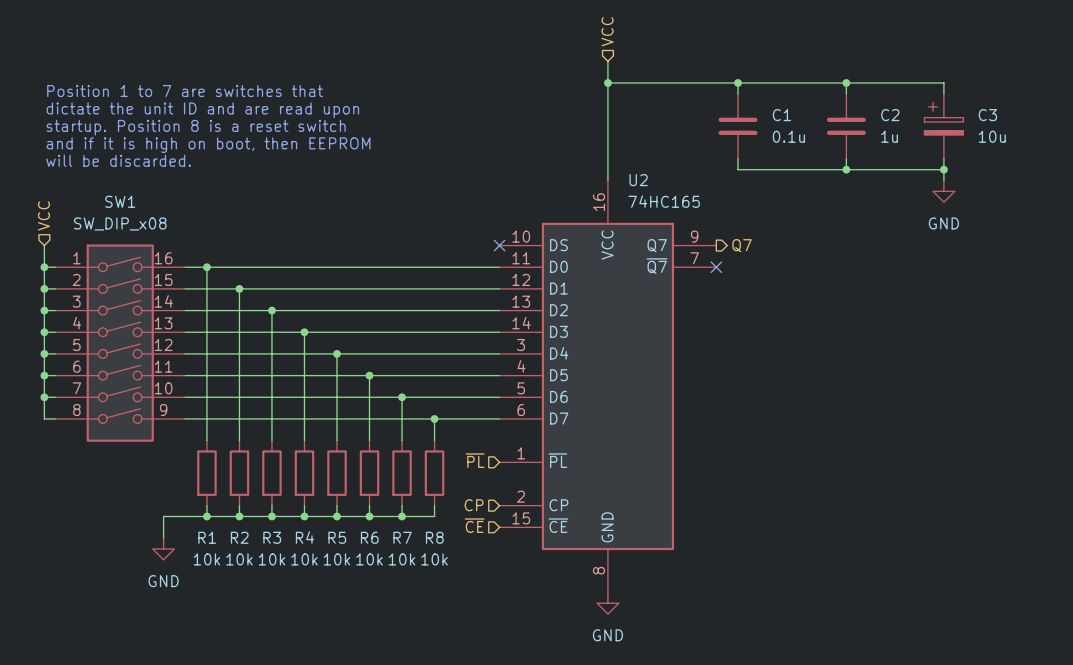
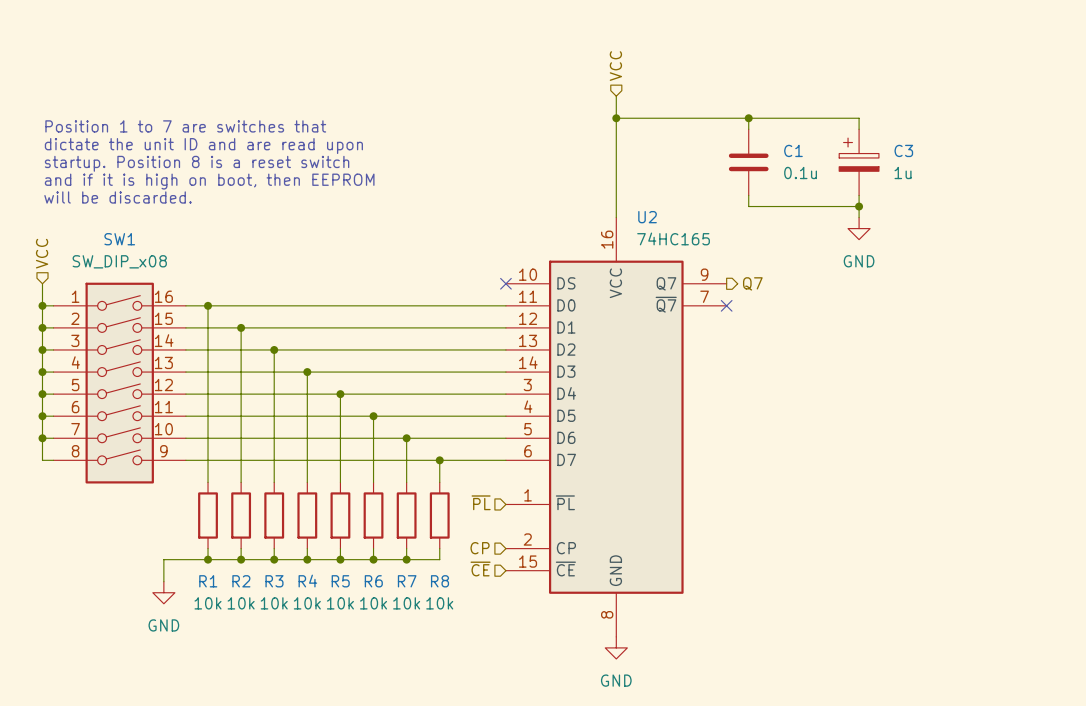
wire: (846, 82) (943, 82) (943, 93) -> none
junction: (846, 82) -> none
C2: 1u (846, 126) -> none
C3 position: (943, 126) -> (859, 162)
C3 value: 10u (992, 136) -> 1u (903, 173)
wire: (943, 158) (943, 180) -> none
wire: (846, 169) (943, 169) -> (859, 206) (859, 217)
junction: (943, 169) -> none
power symbol position: GND (943, 191) -> GND (859, 228)

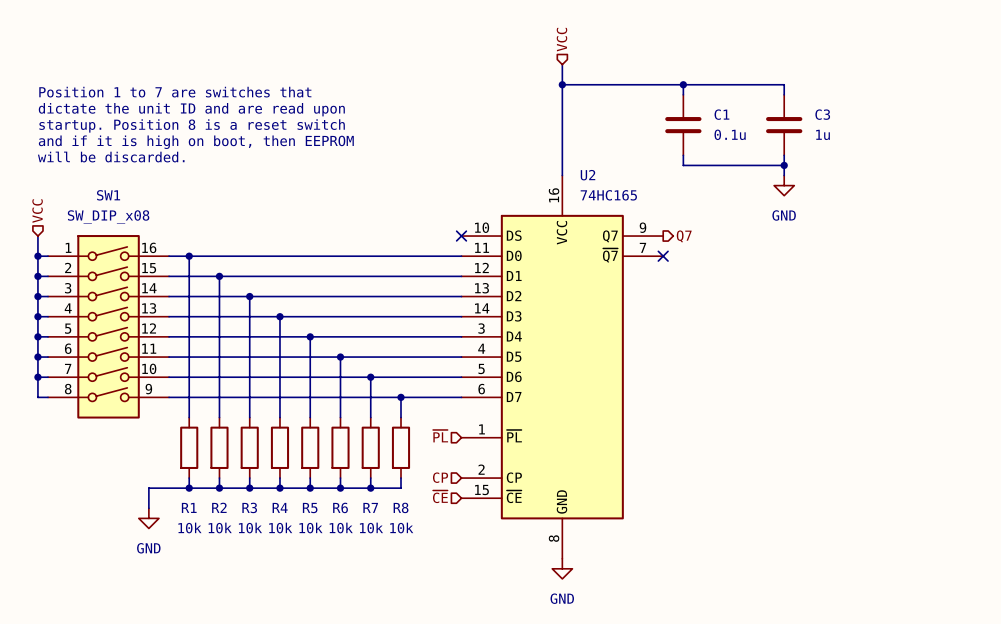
C3 symbol: [839, 129, 879, 196] -> [766, 94, 803, 156]

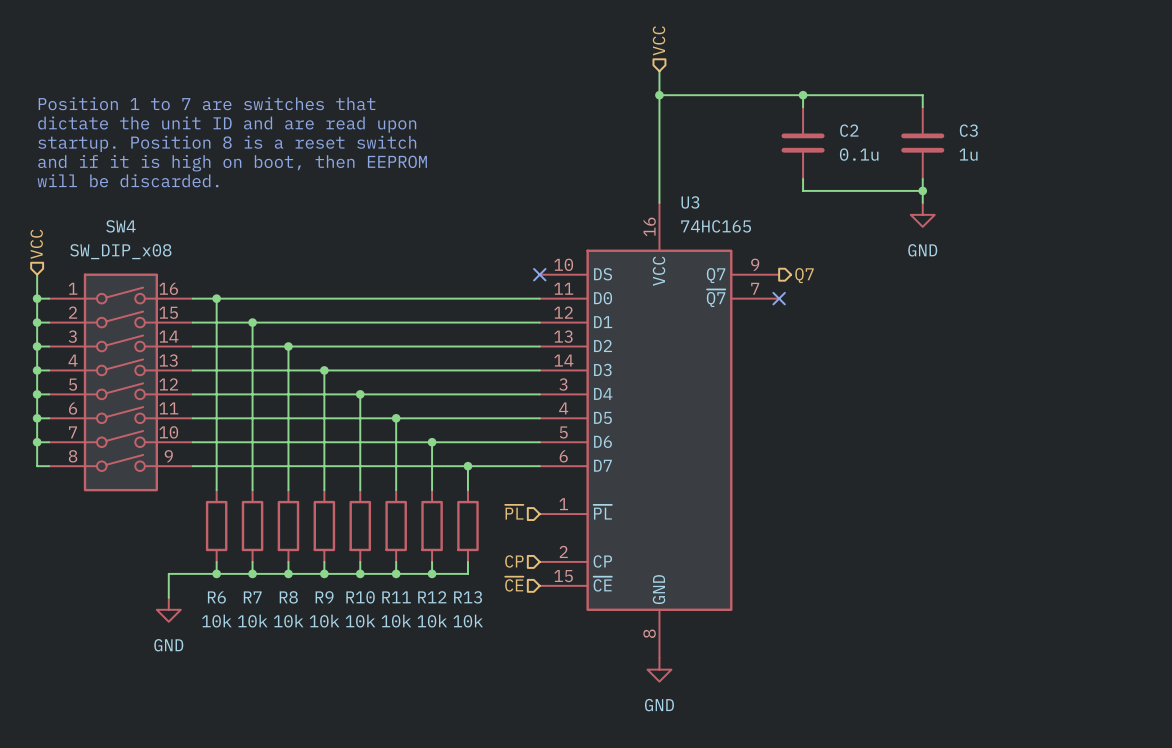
C1 name: C1 (721, 114) -> C2 (849, 130)
U2 name: U2 (588, 175) -> U3 (690, 202)
SW1 name: SW1 (108, 195) -> SW4 (120, 226)
R1 name: R1 (189, 507) -> R6 (216, 597)
R2 name: R2 (219, 507) -> R7 (252, 597)
R3 name: R3 (249, 507) -> R8 (288, 597)
R4 name: R4 (280, 507) -> R9 (324, 597)
R6 name: R6 (340, 507) -> R11 (396, 597)
R7 name: R7 (370, 507) -> R12 (432, 597)
R8 name: R8 (401, 507) -> R13 (468, 597)
R5 name: R5 (310, 508) -> R10 (360, 597)

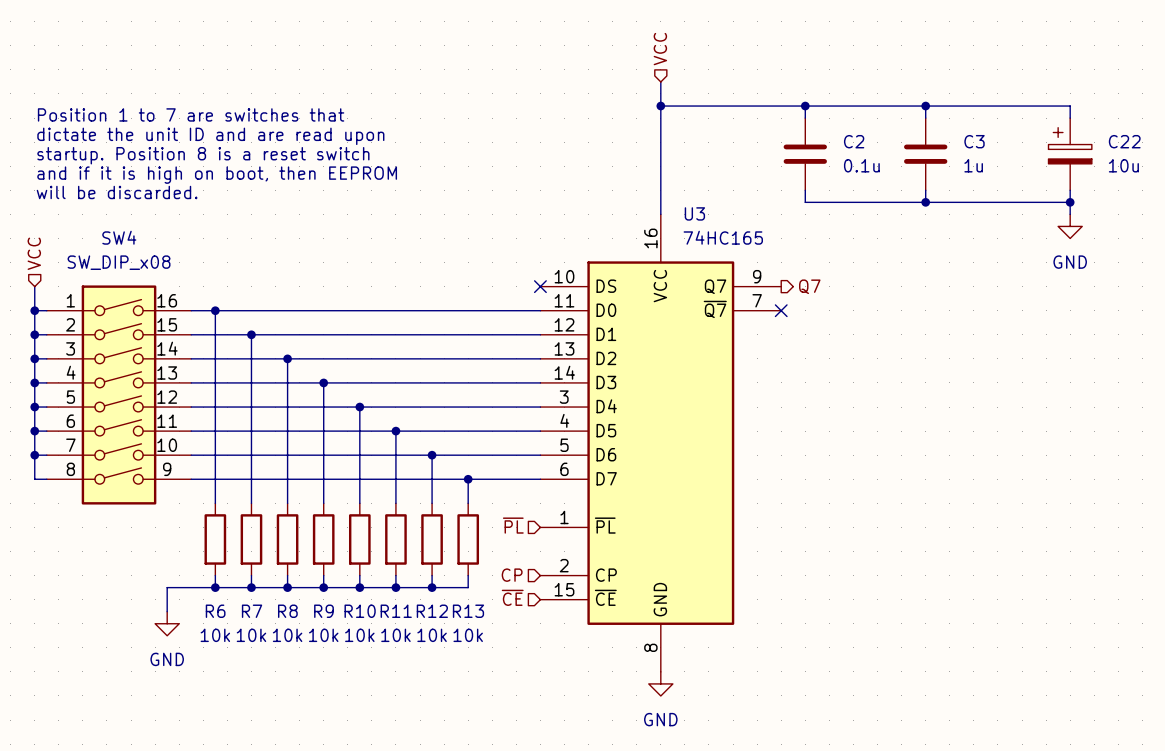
wire: none -> (925, 106) (1070, 106) (1070, 118)
junction: none -> (925, 106)
C22: none -> 10u (1070, 154)
wire: none -> (1070, 190) (1070, 214)
wire: (922, 190) (922, 202) -> (925, 202) (1070, 202)
junction: none -> (1070, 202)
power symbol position: GND (922, 214) -> GND (1070, 226)

